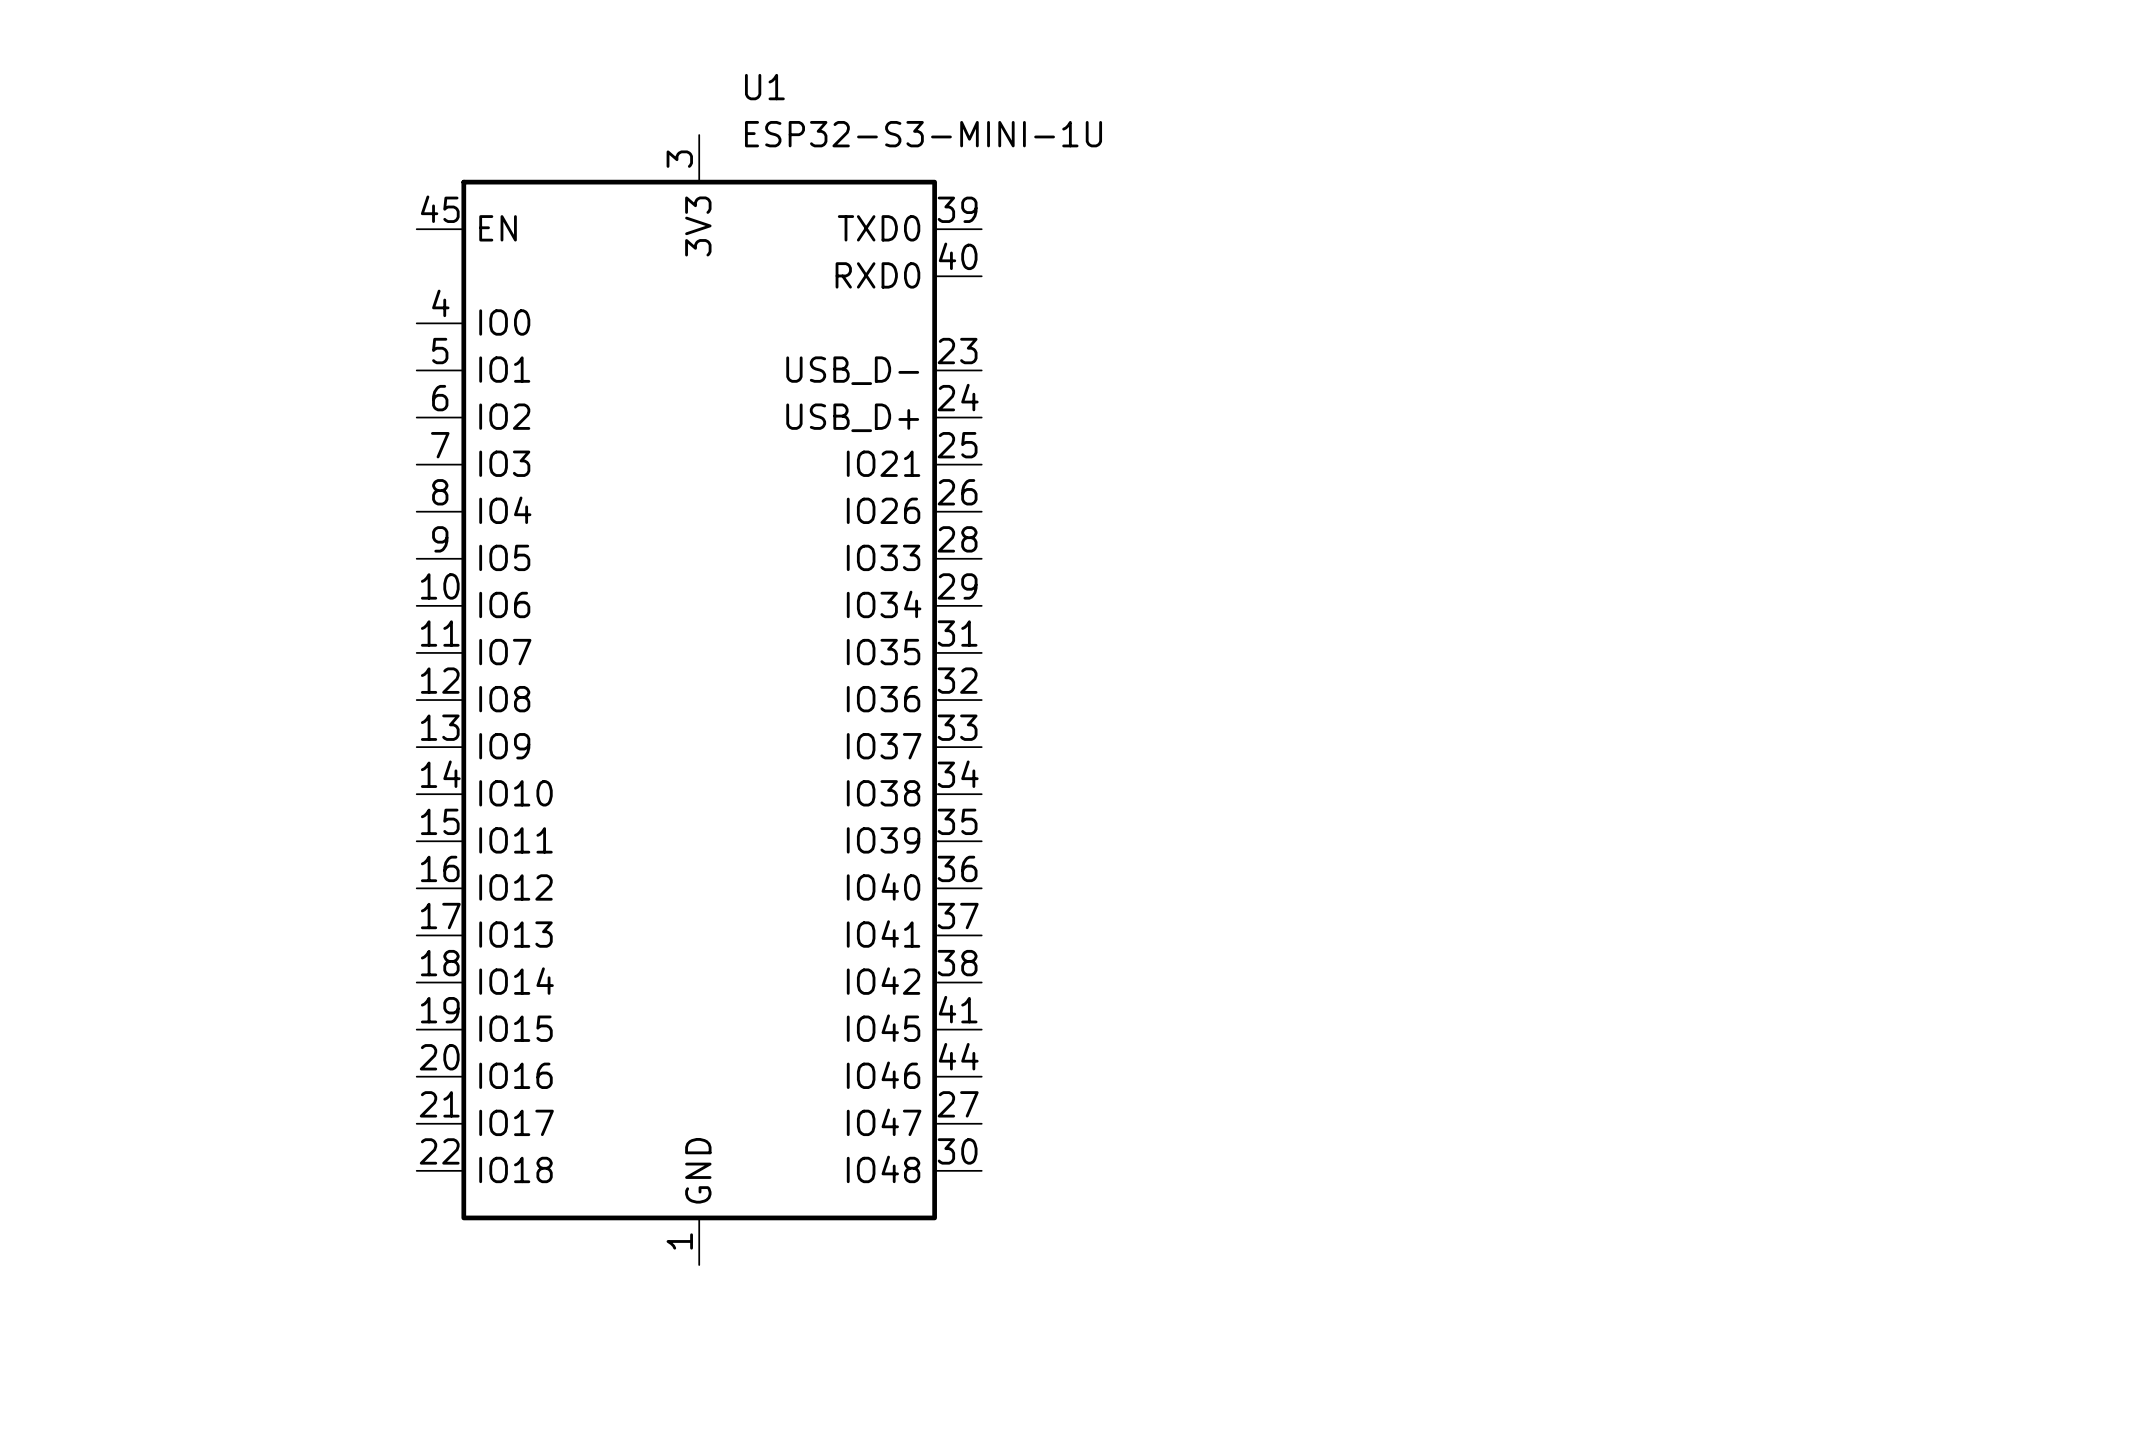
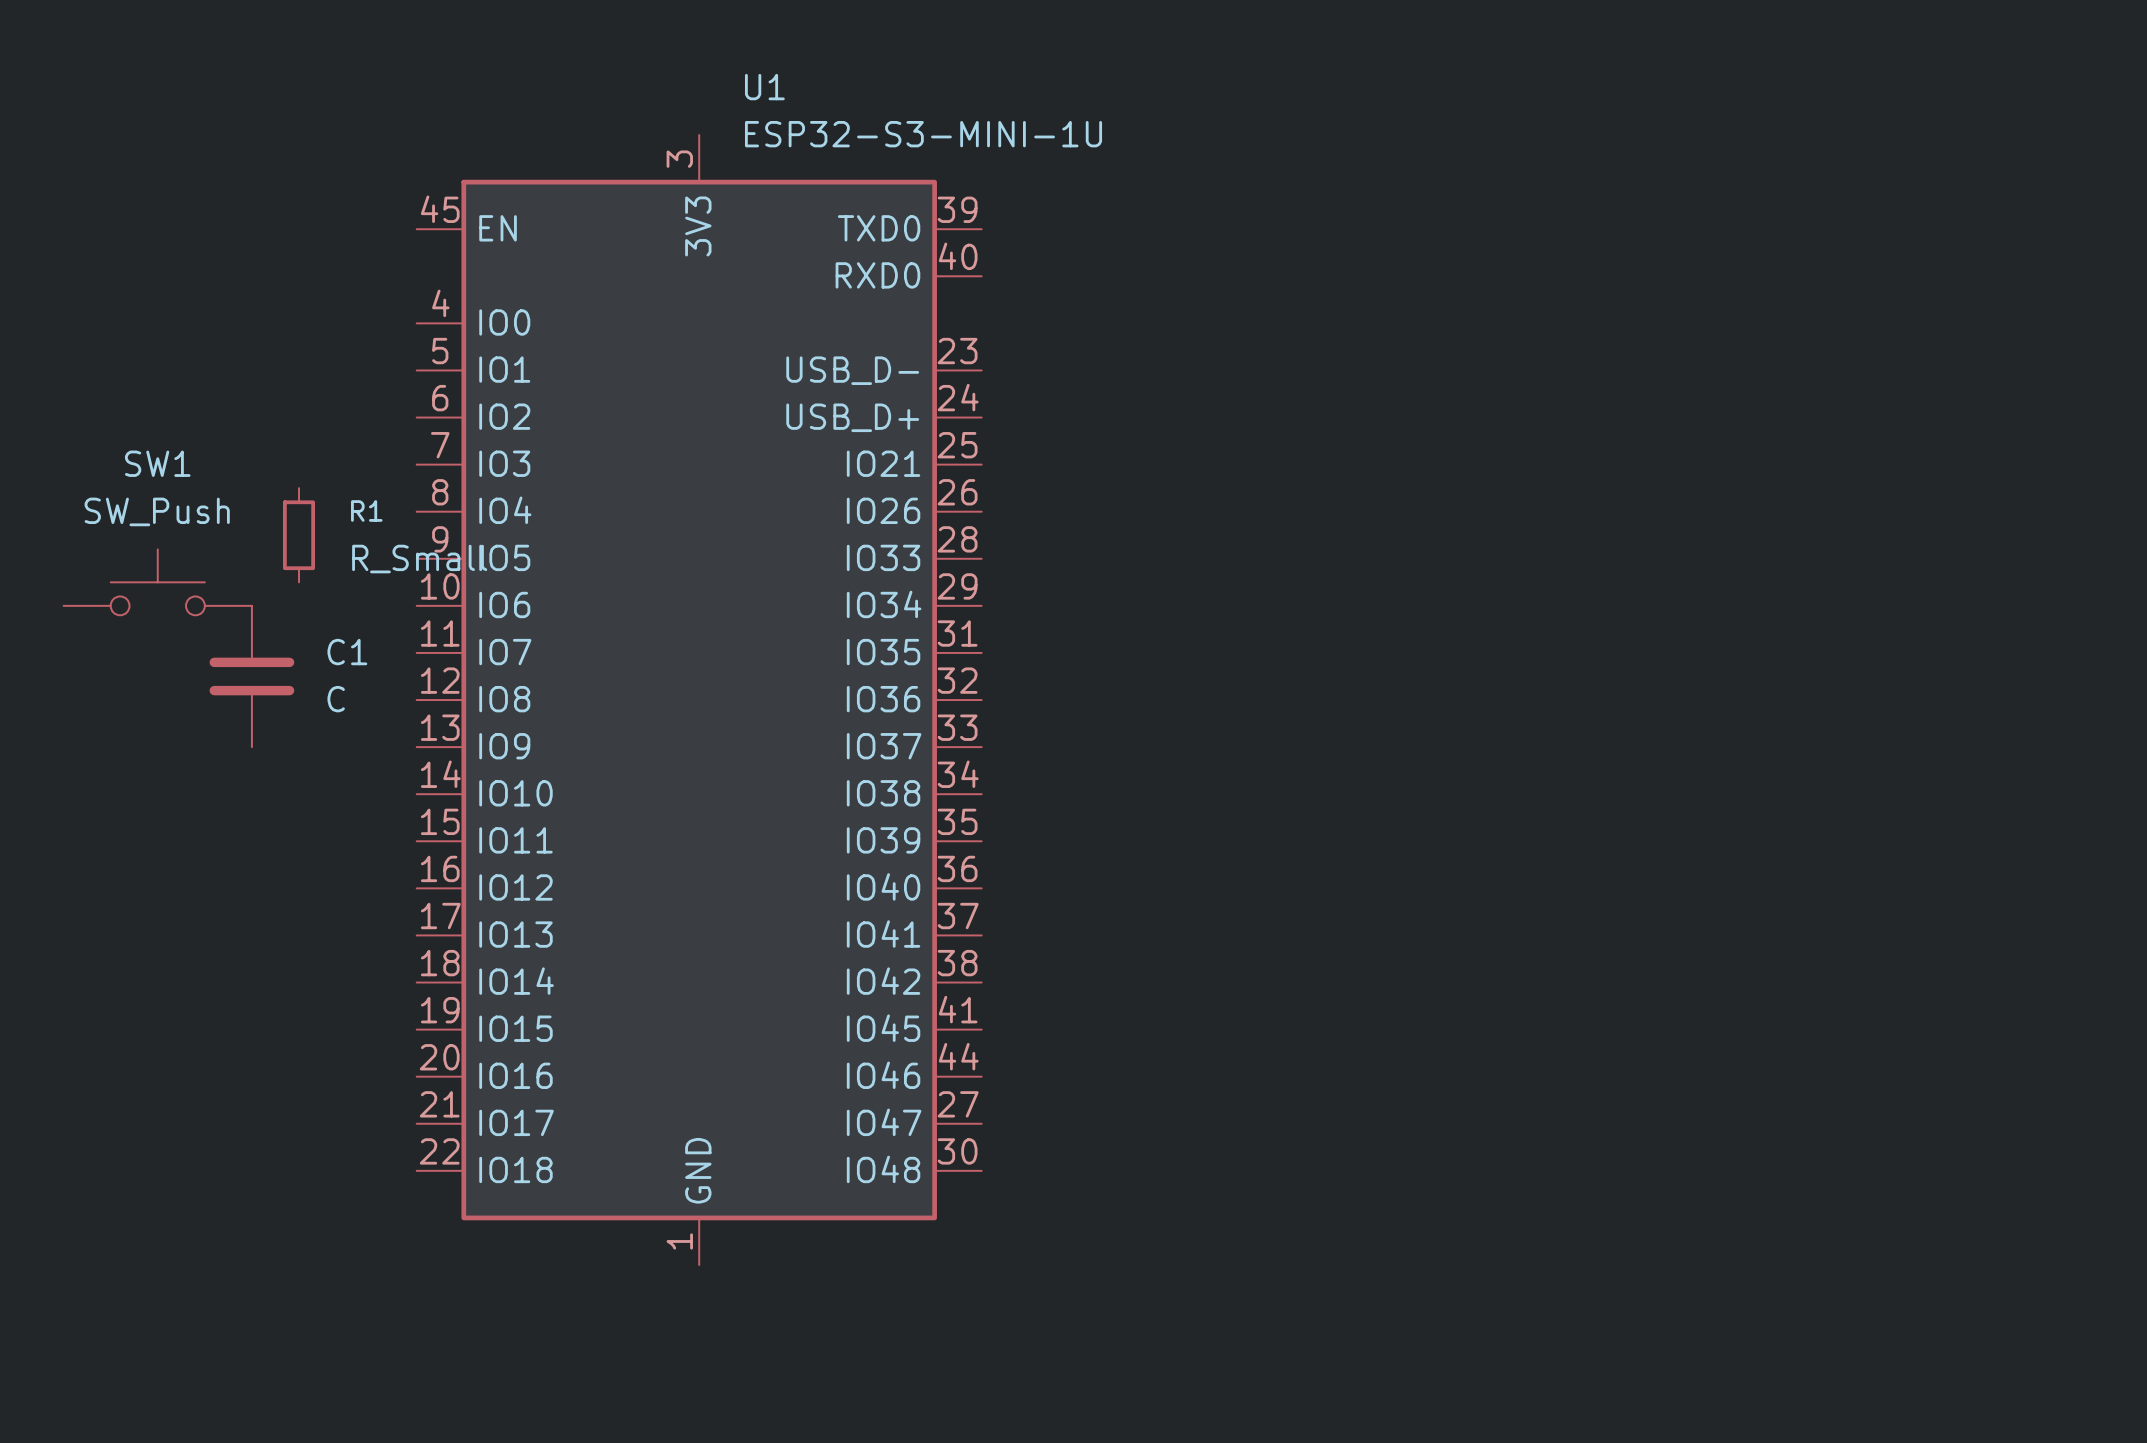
R1: none -> R_Small (299, 535)
SW1: none -> SW_Push (157, 582)
C1: none -> C (251, 676)

